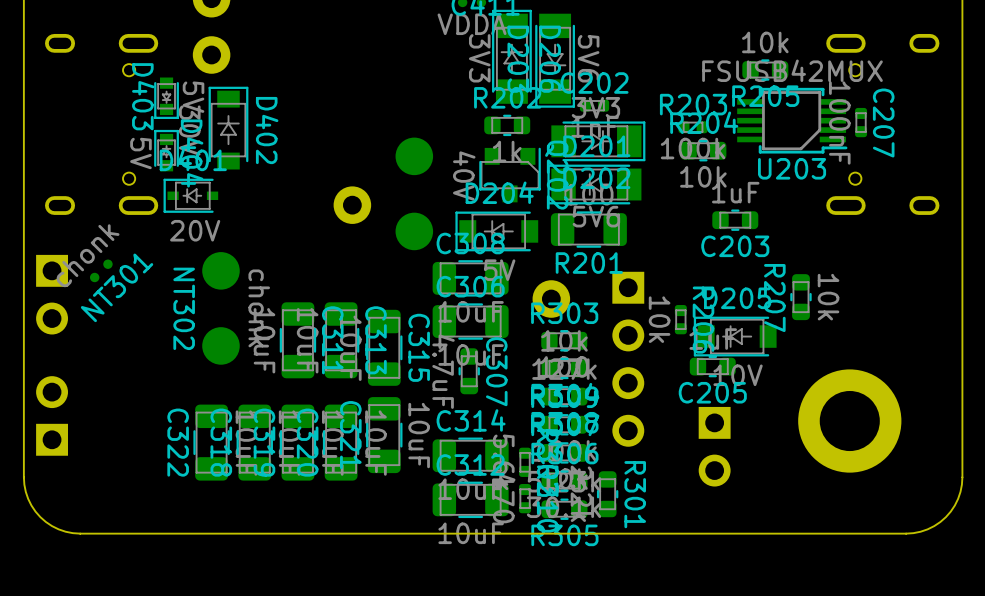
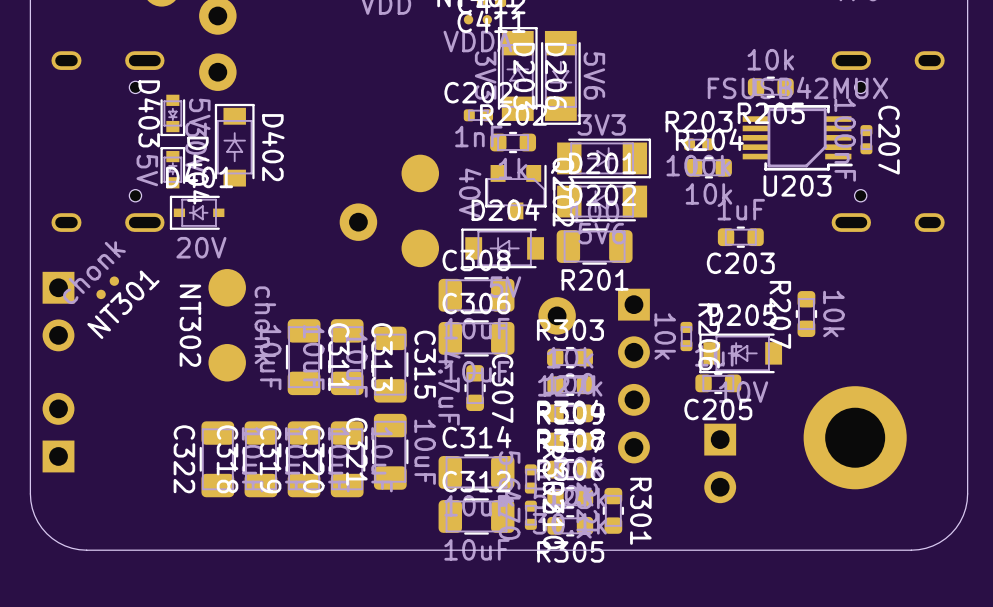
C202 position: (594, 105) -> (478, 115)

